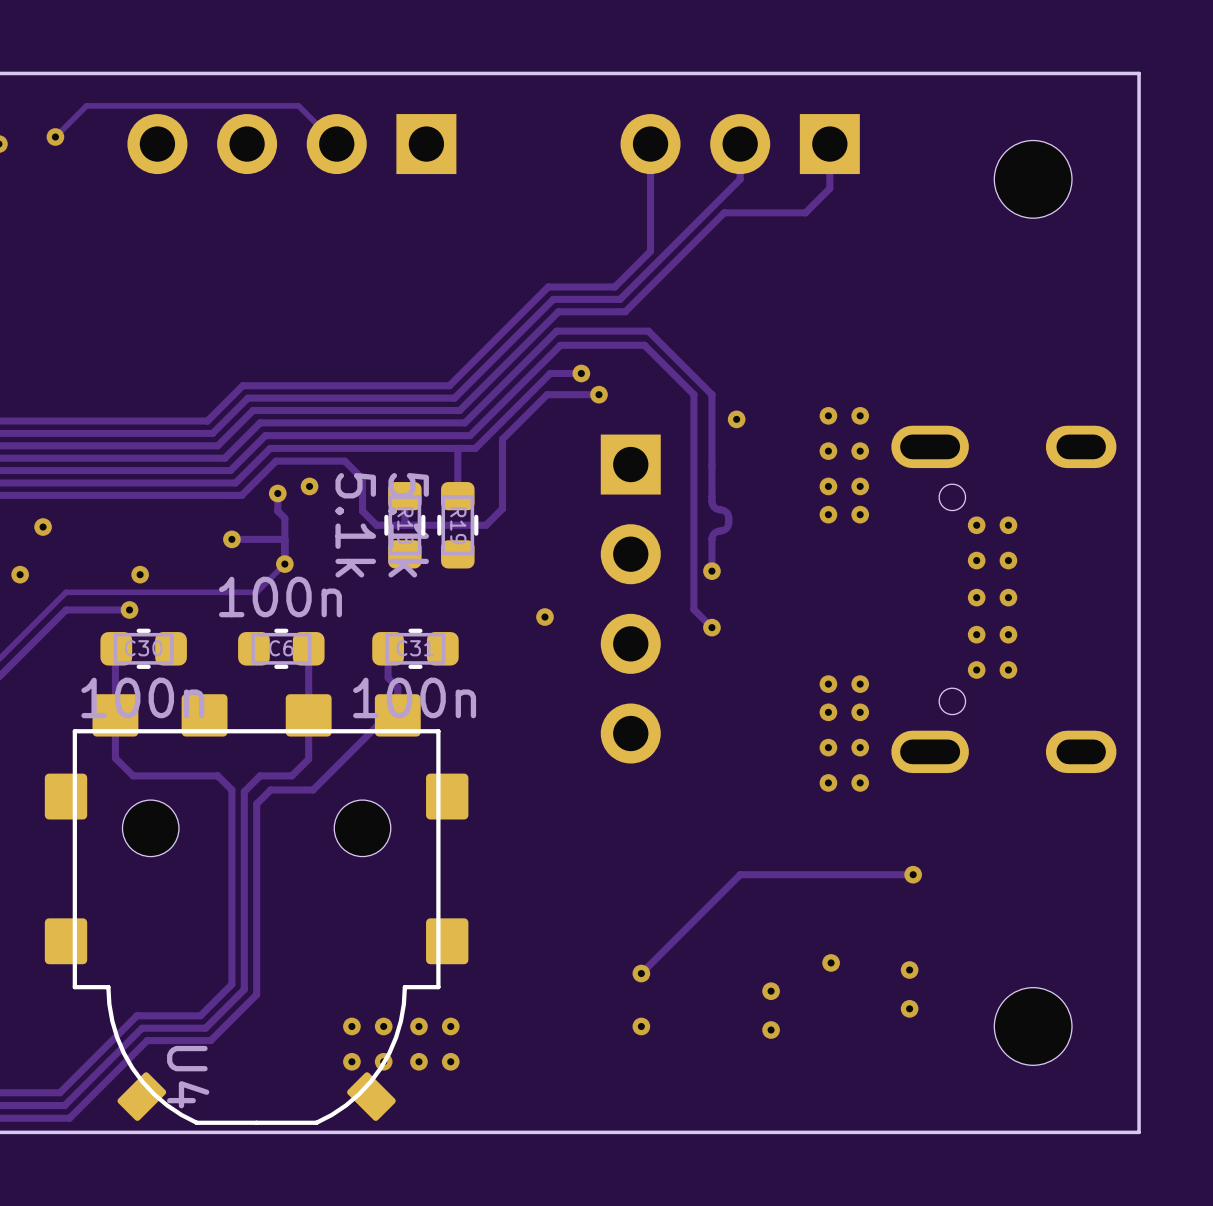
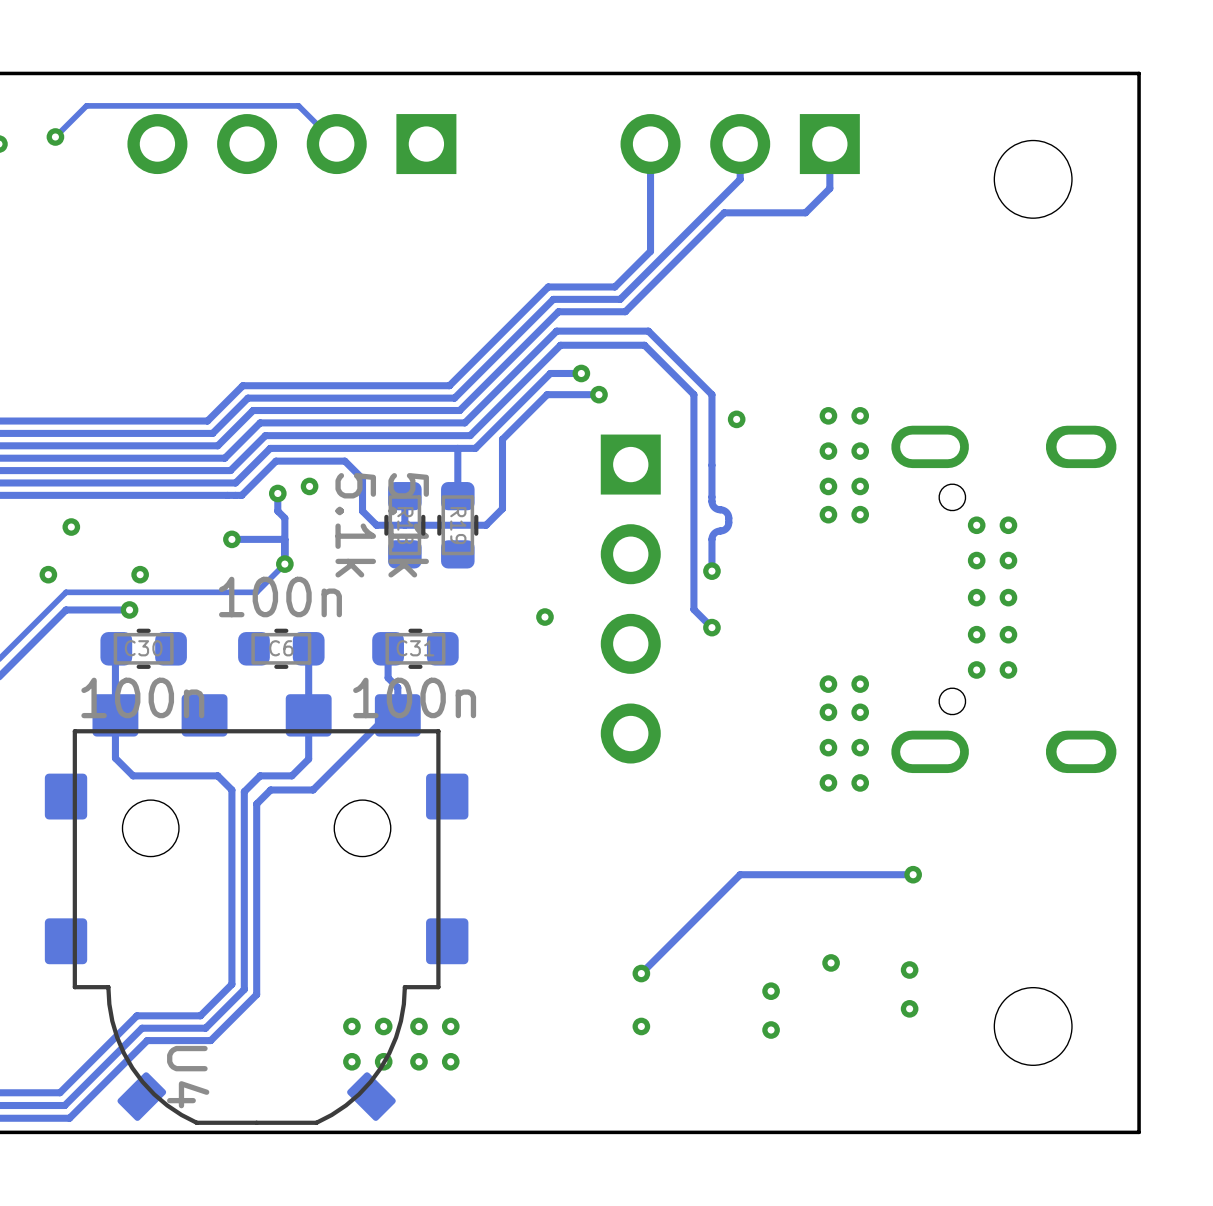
via: (43, 527) -> none
via: none -> (71, 527)
via: (20, 574) -> none
via: none -> (48, 574)

